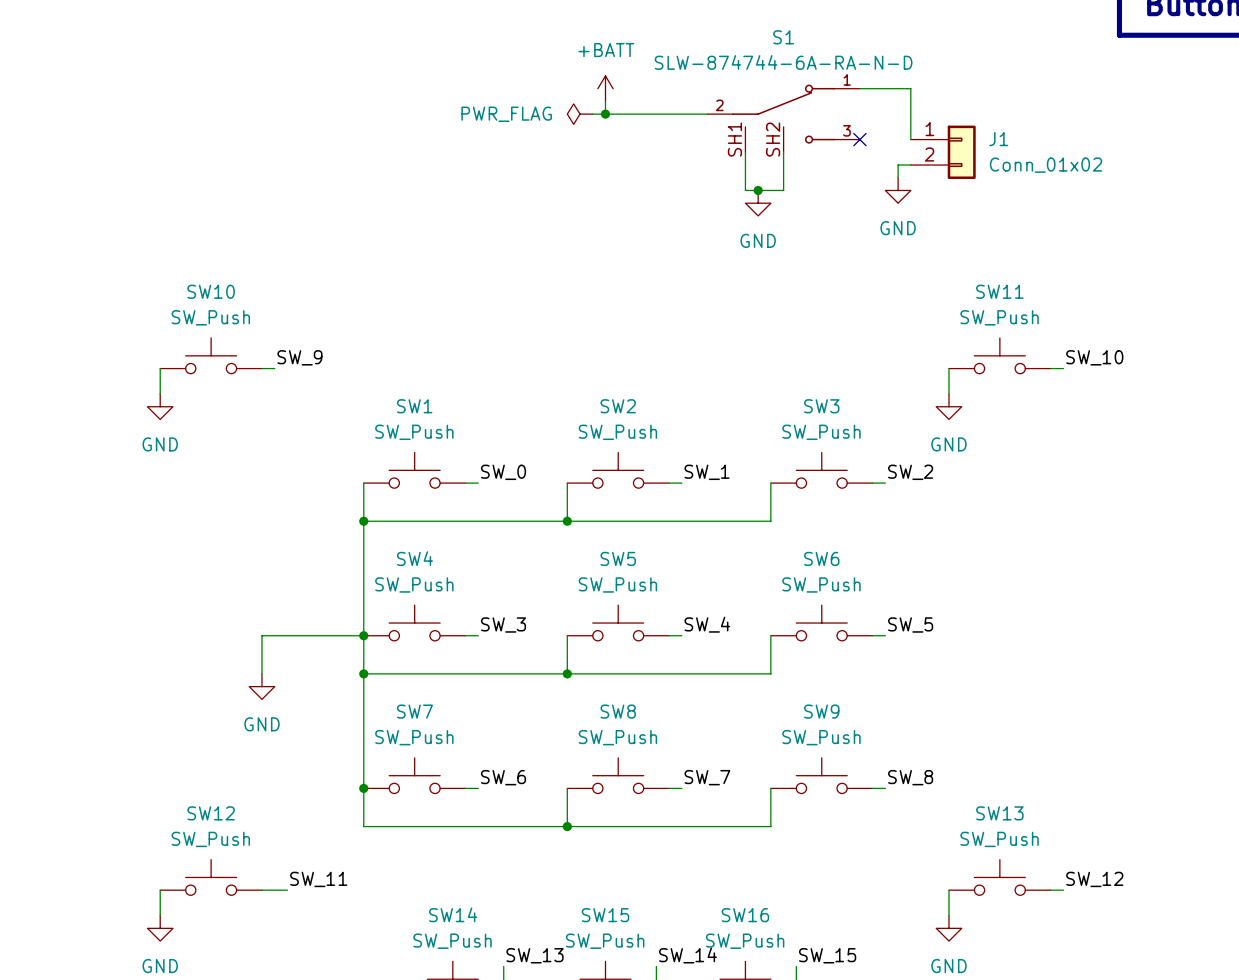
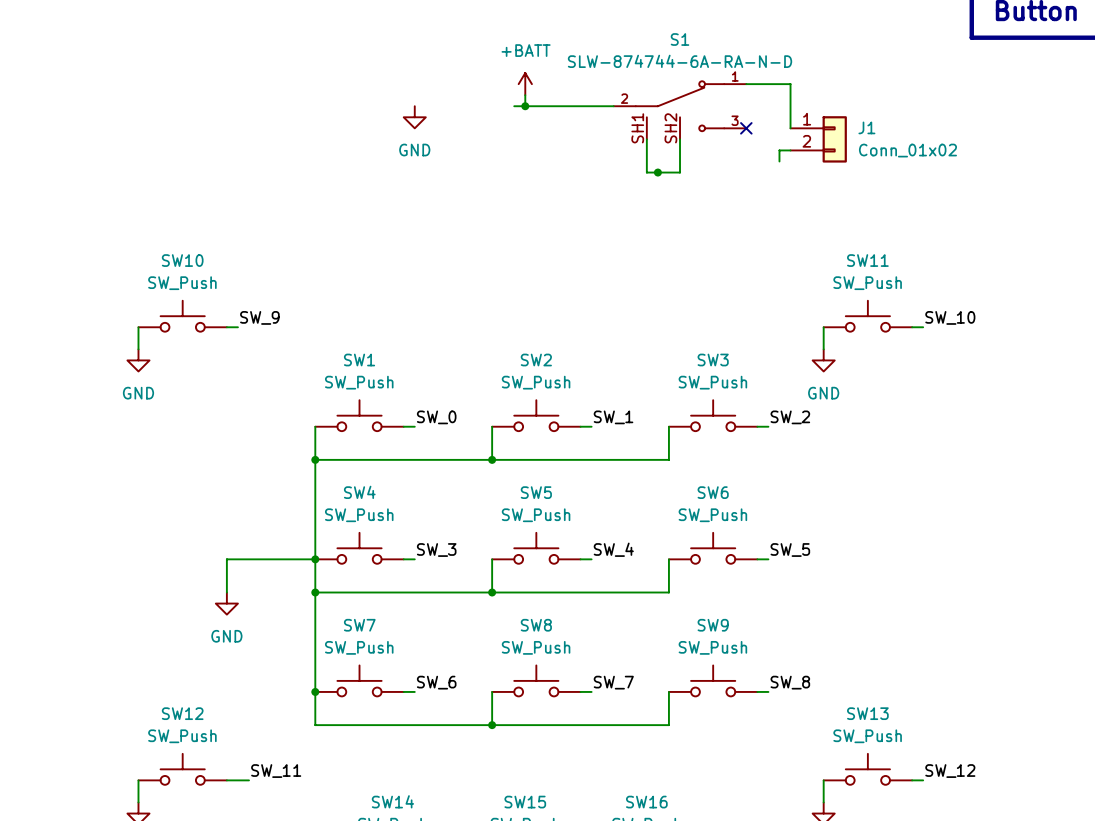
power symbol: PWR_FLAG (580, 114) -> none
power symbol: none -> GND (414, 117)
power symbol: GND (898, 190) -> none
power symbol: GND (758, 203) -> none

